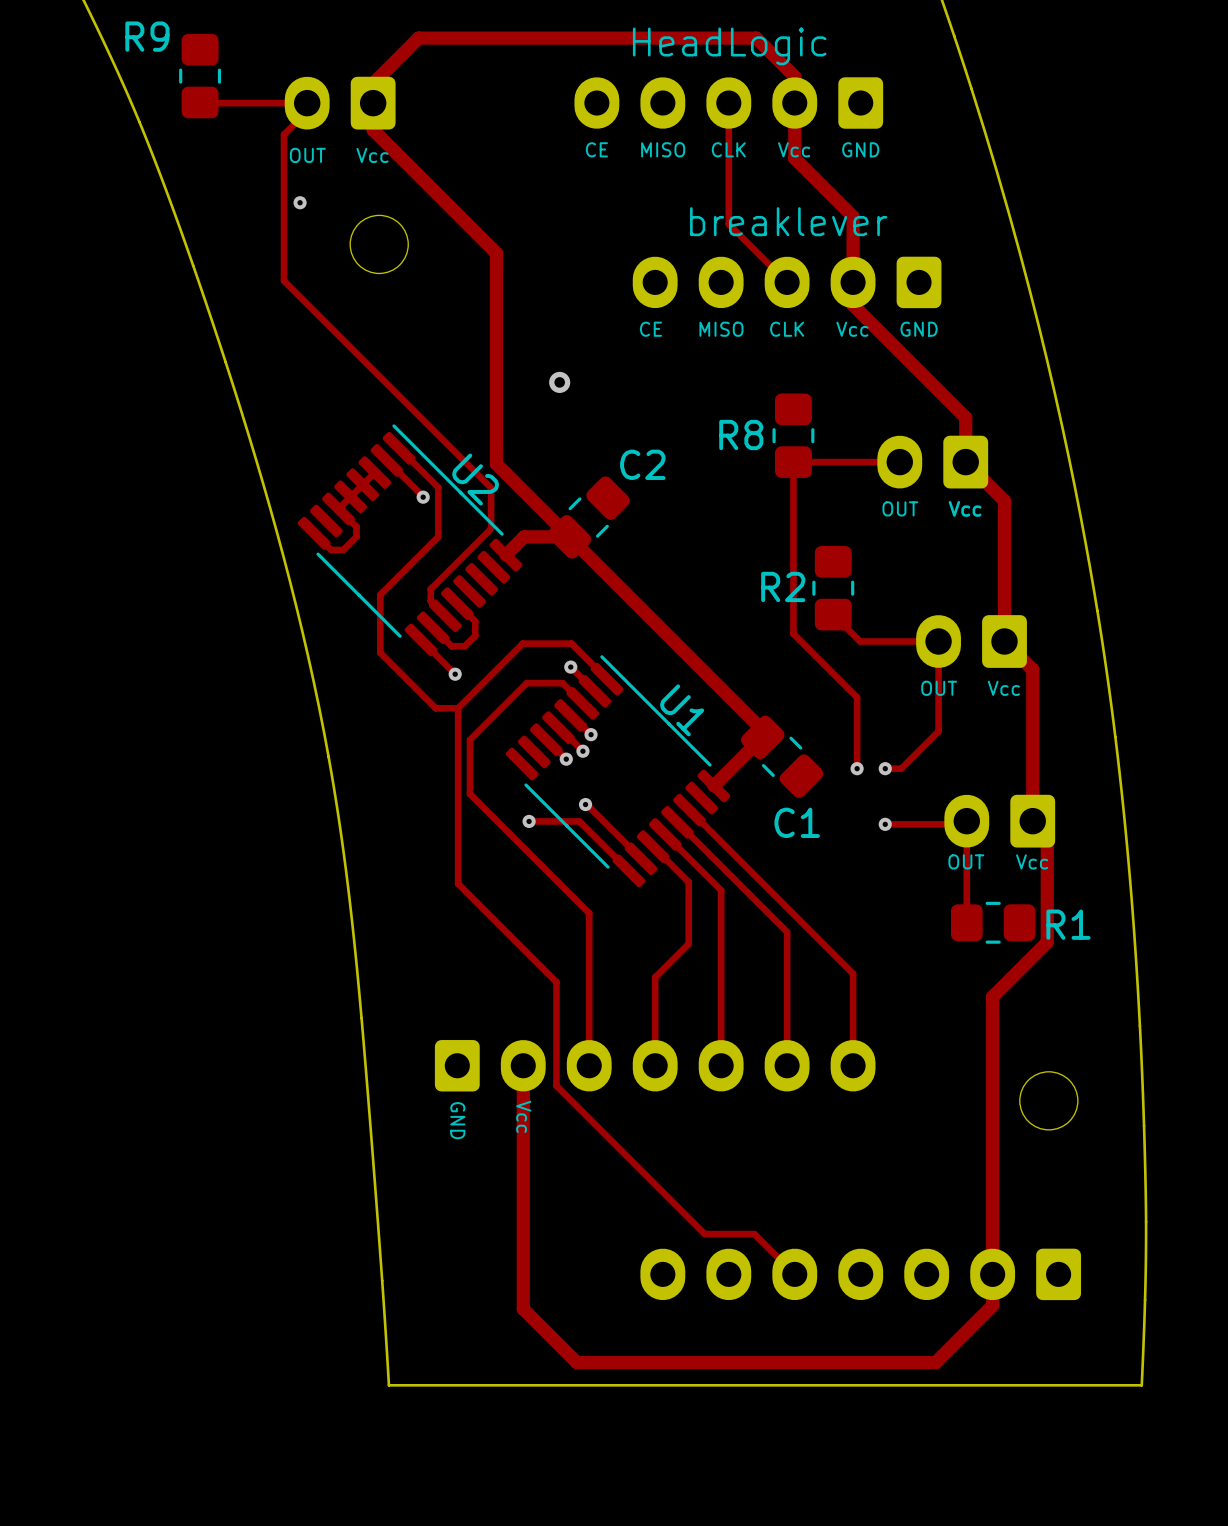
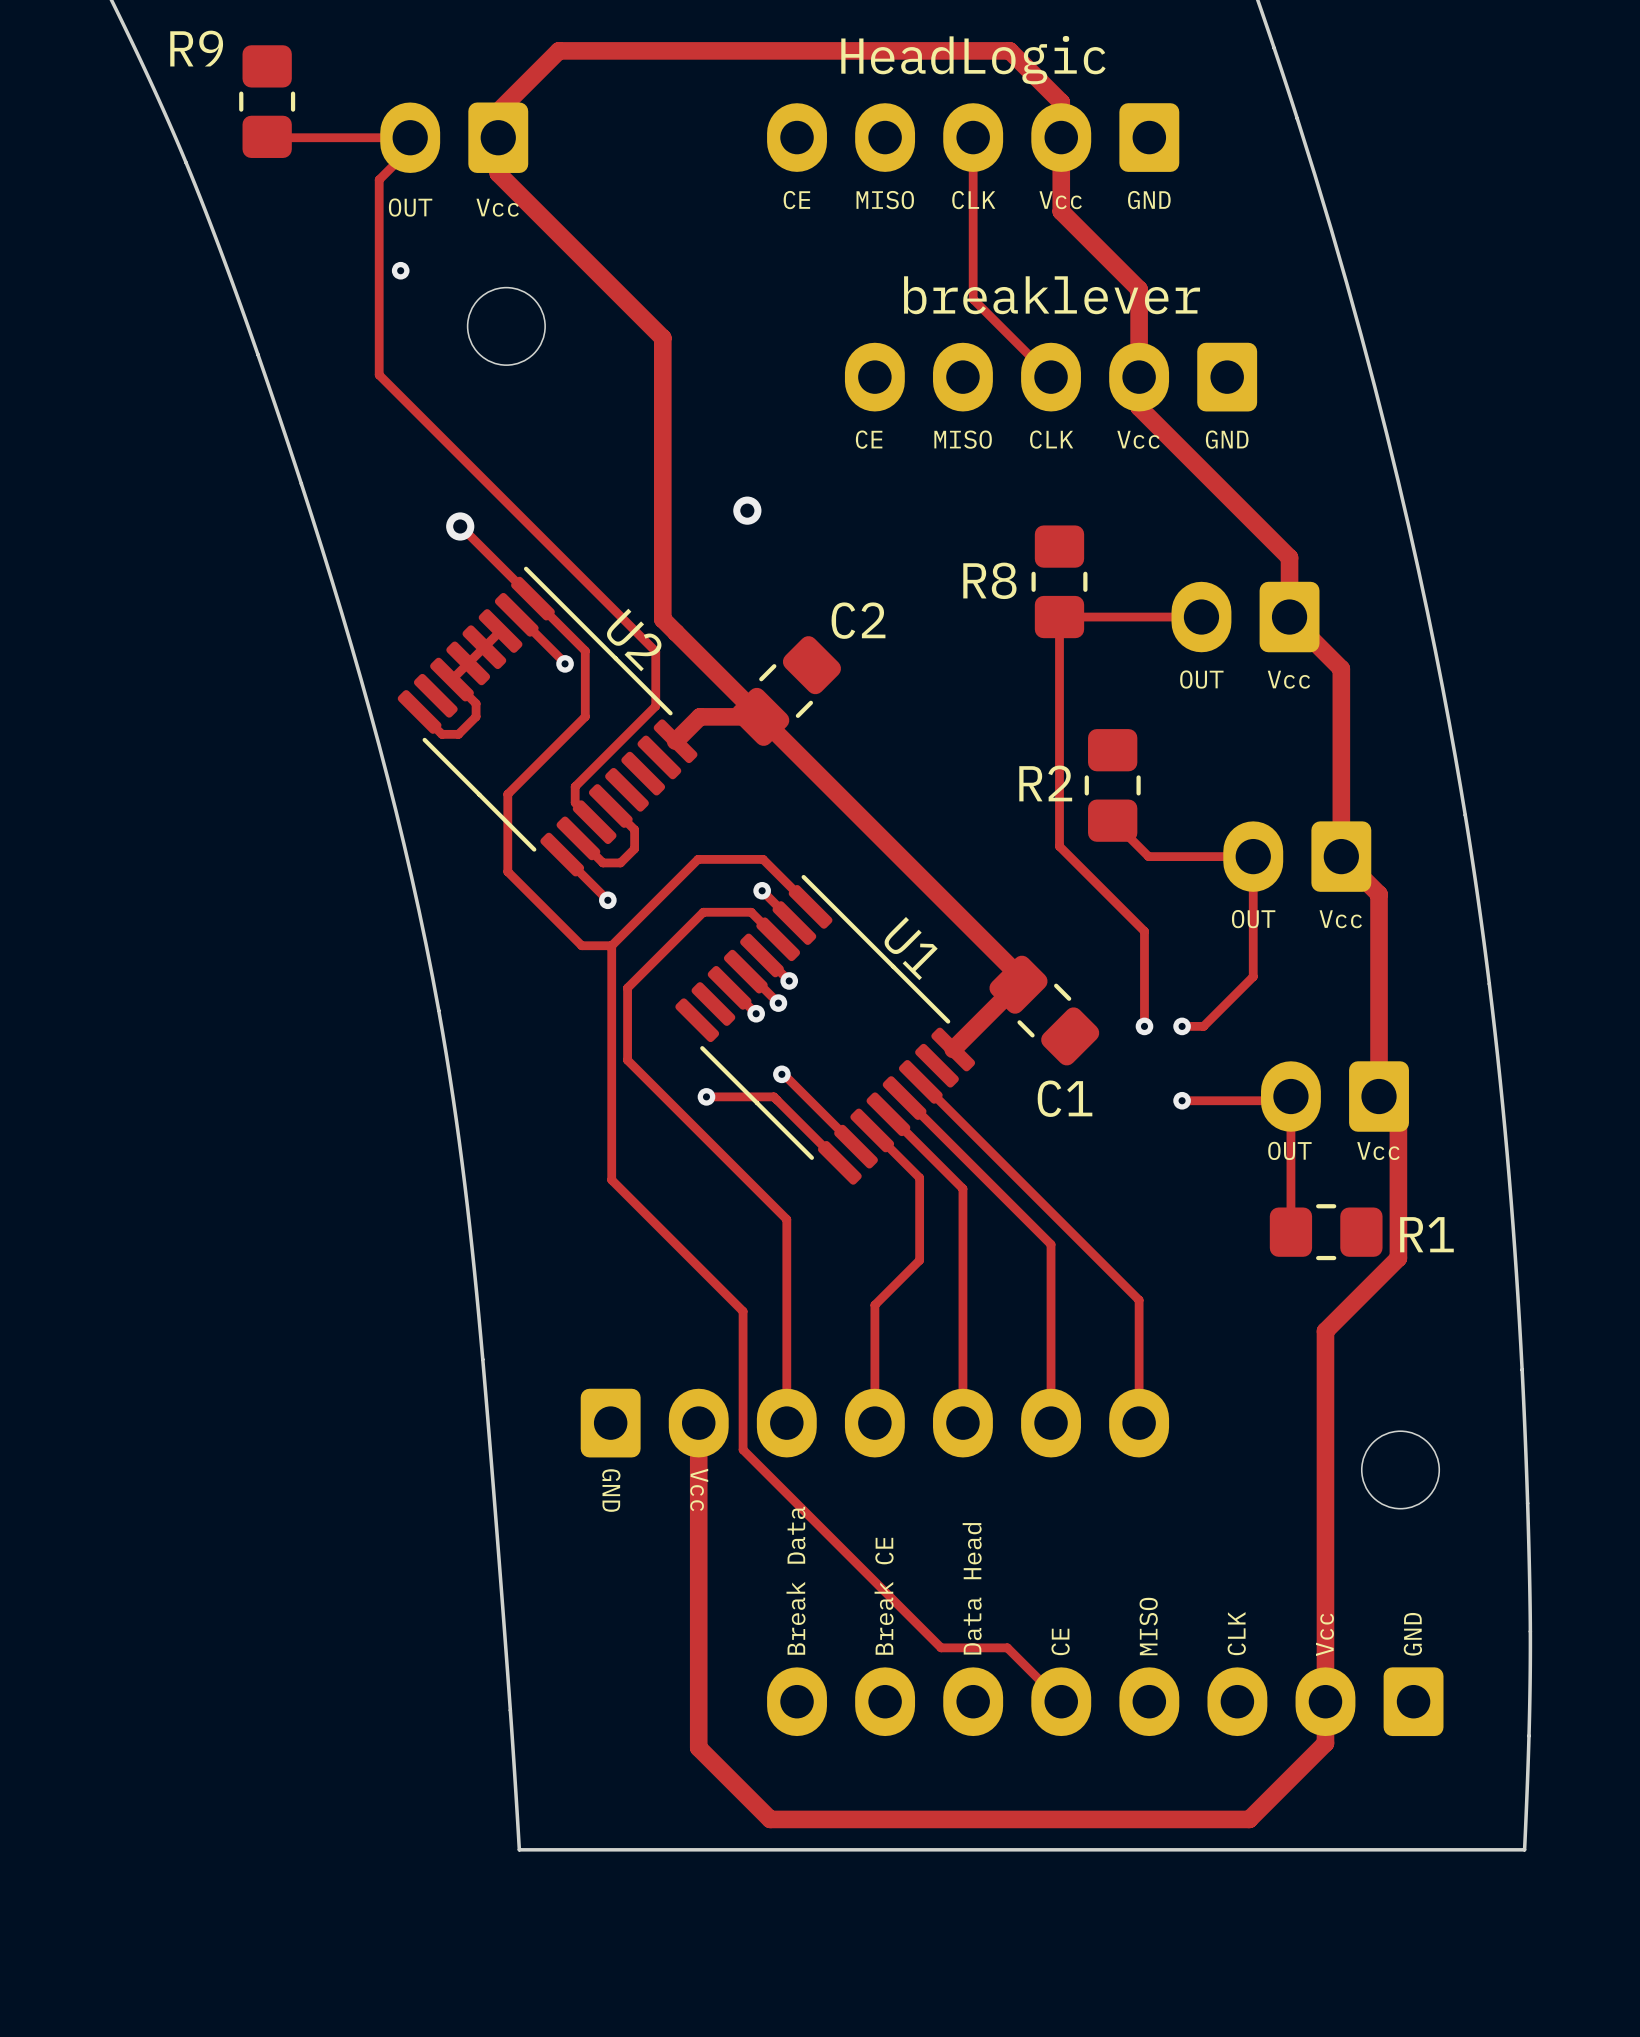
via: none -> (460, 526)
track: none -> (460, 526) (532, 598)
part: none -> (1105, 1701)

